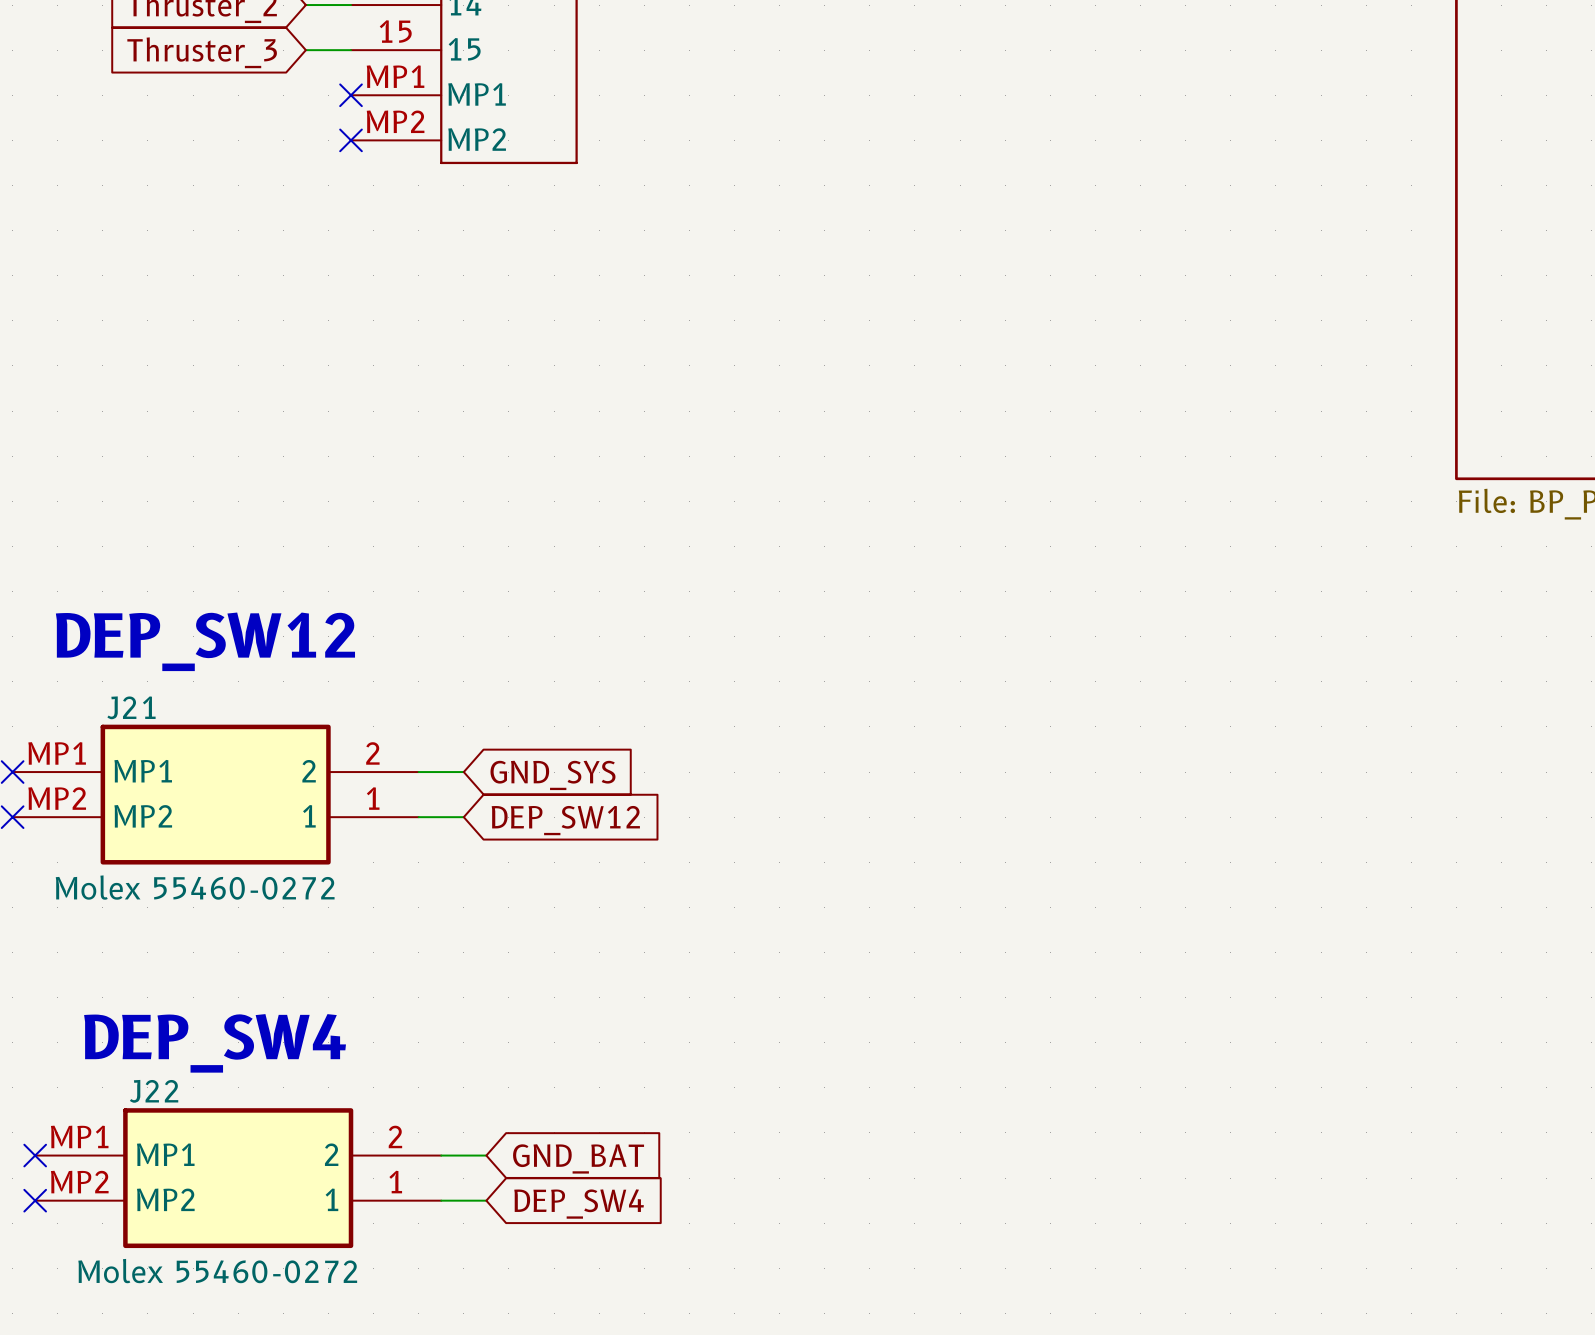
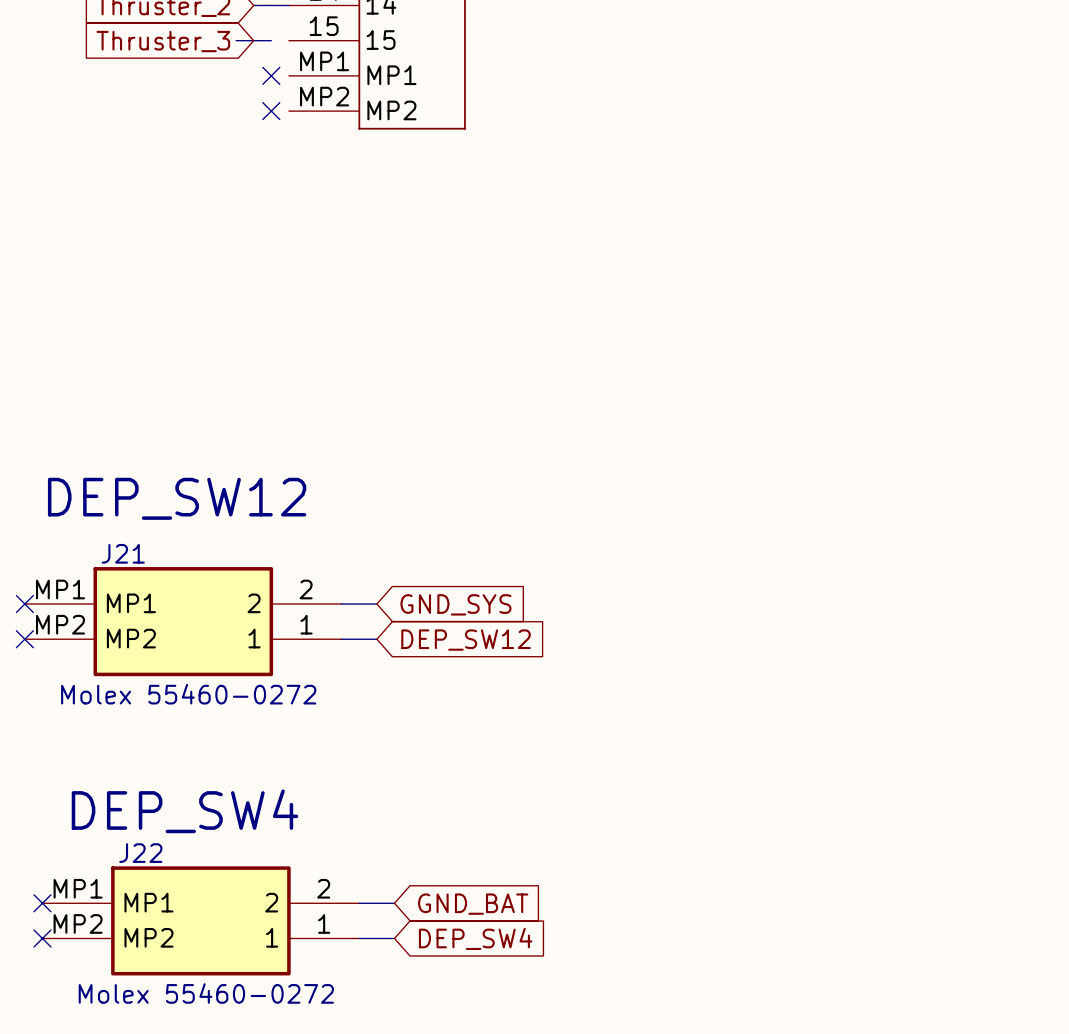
wire: (328, 50) (351, 50) -> (236, 40) (253, 40)
no-connect mark position: (351, 95) -> (271, 75)
no-connect mark position: (351, 140) -> (271, 111)

